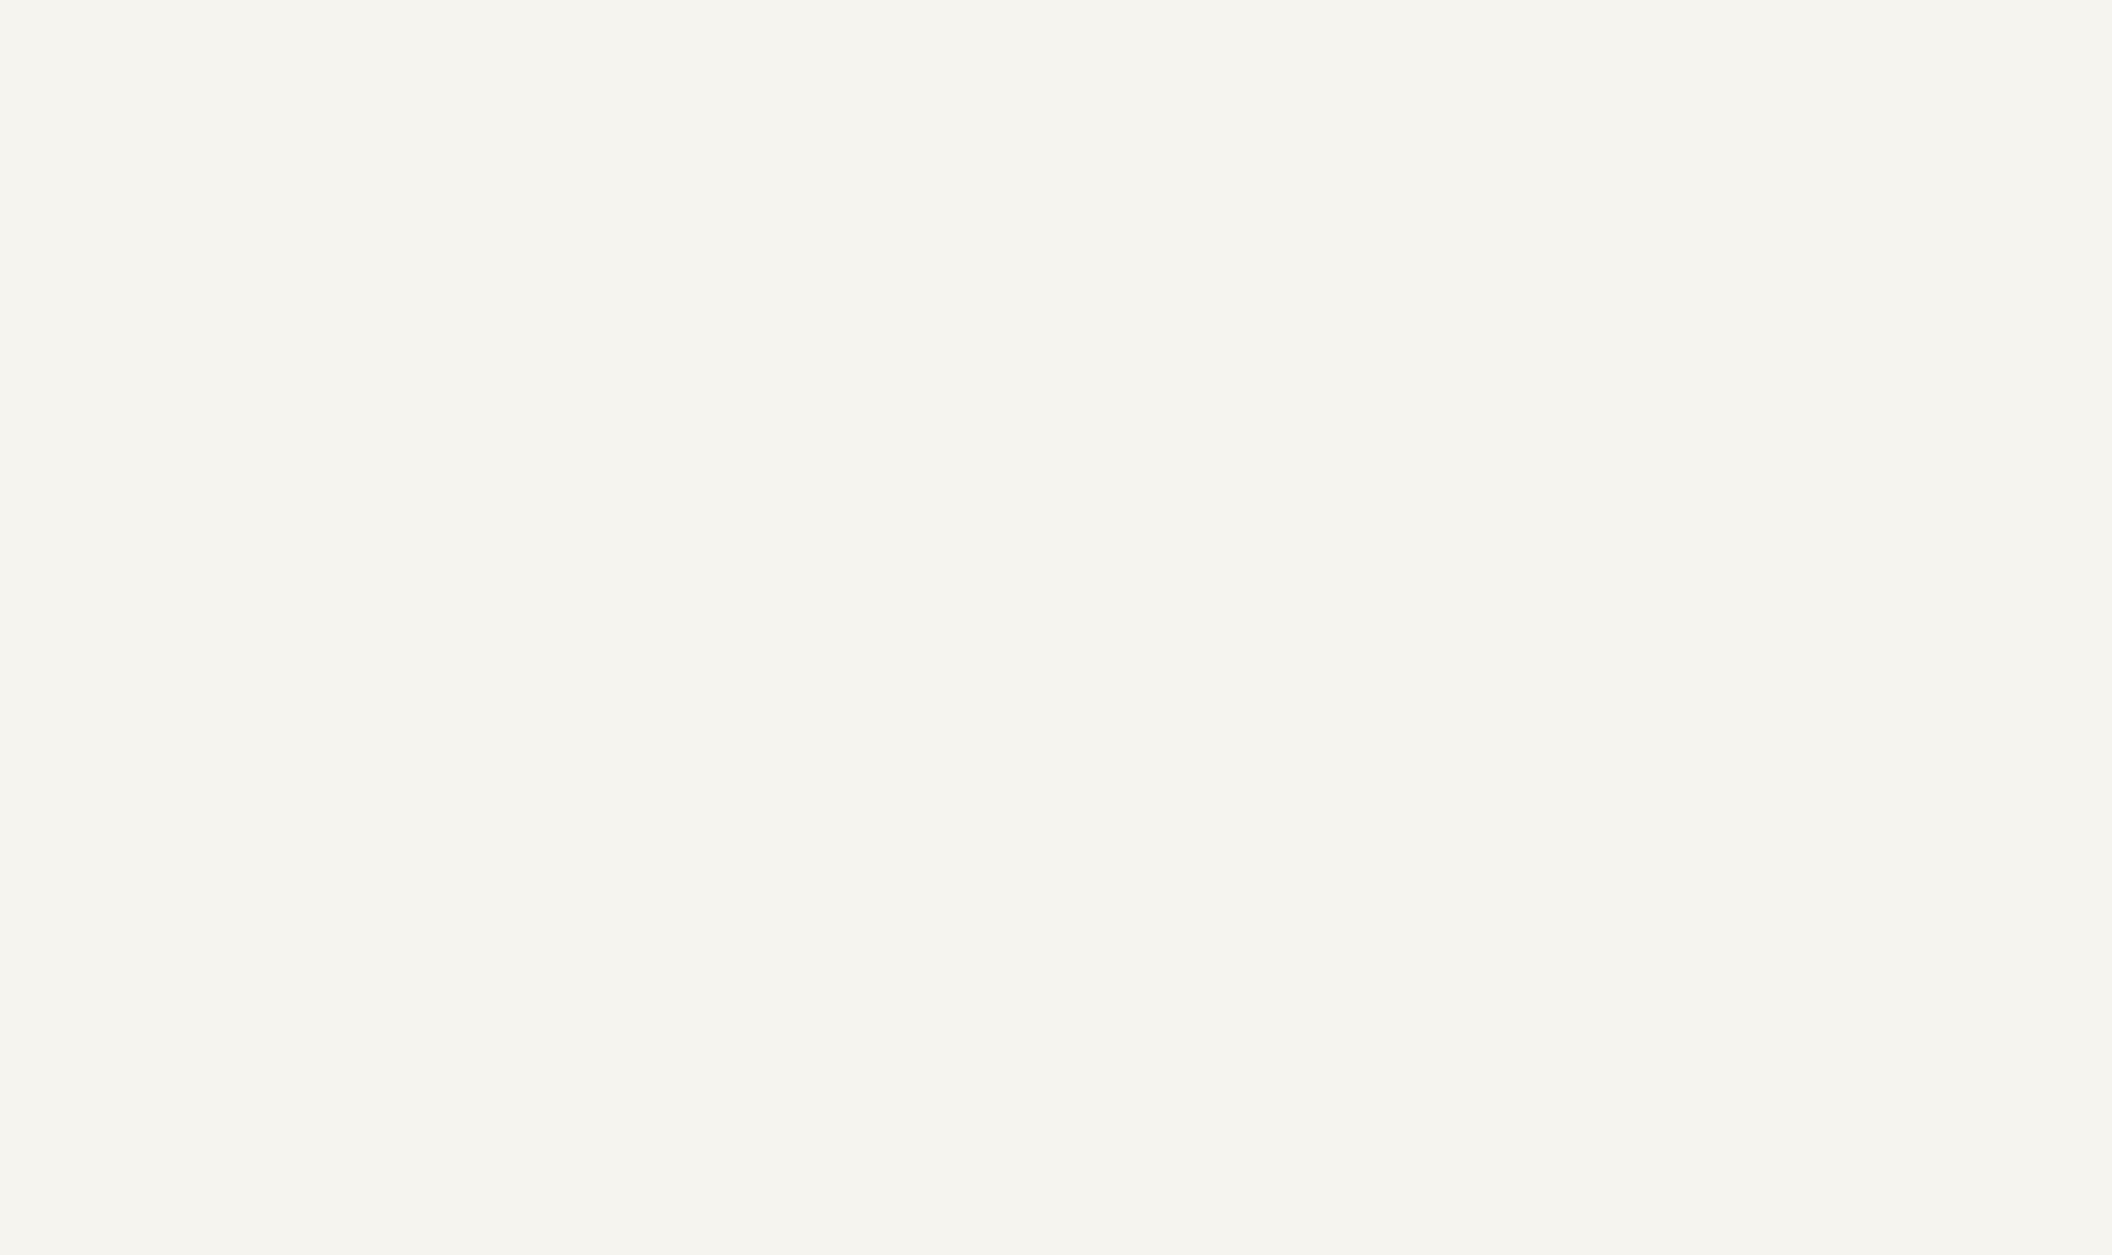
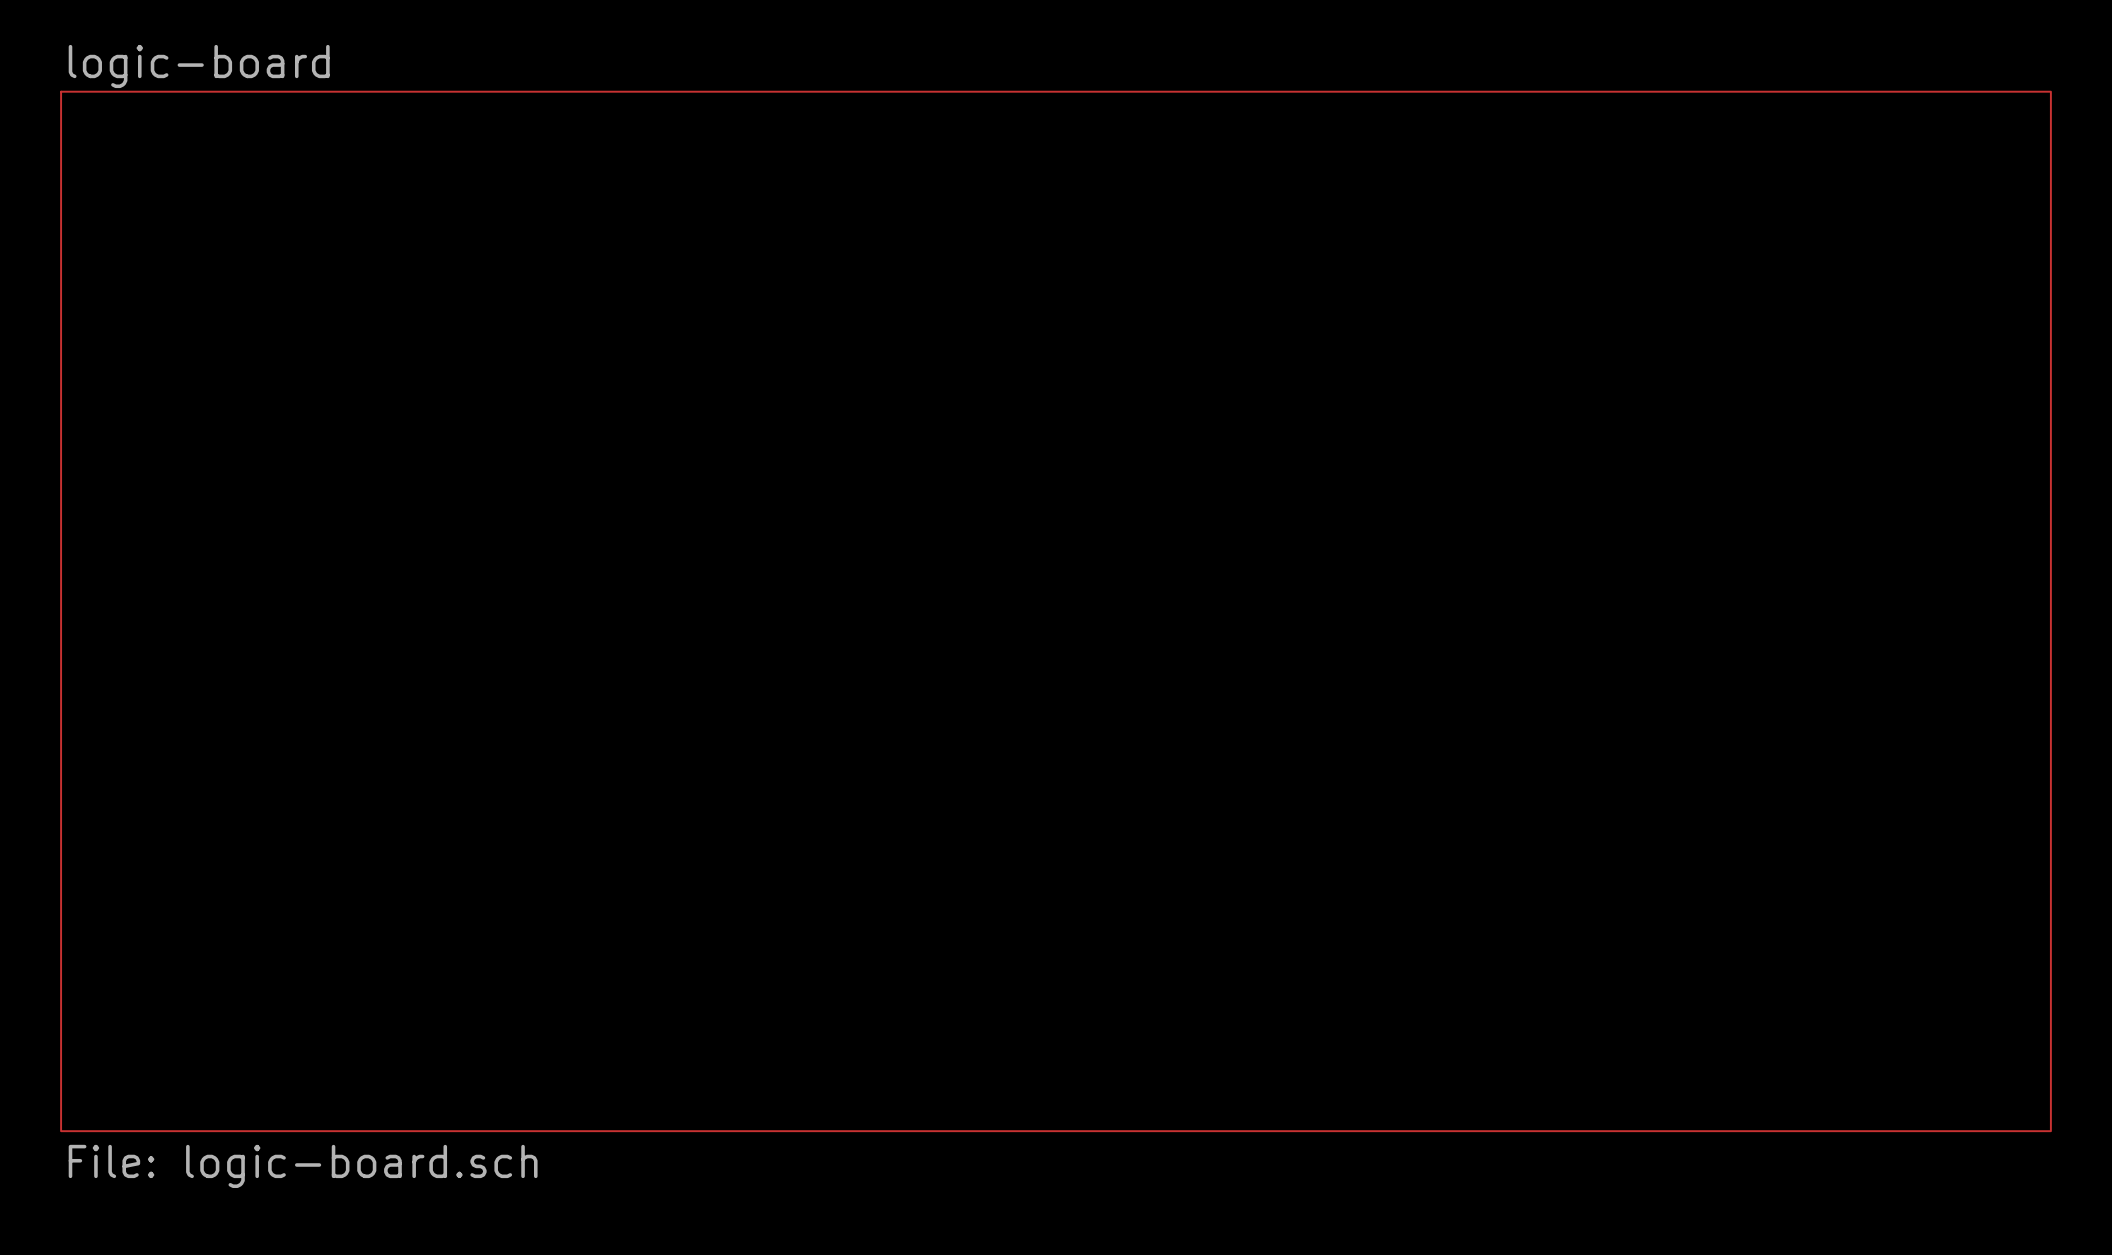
sheet logic-board: none -> File: logic-board.sch (1055, 611)

